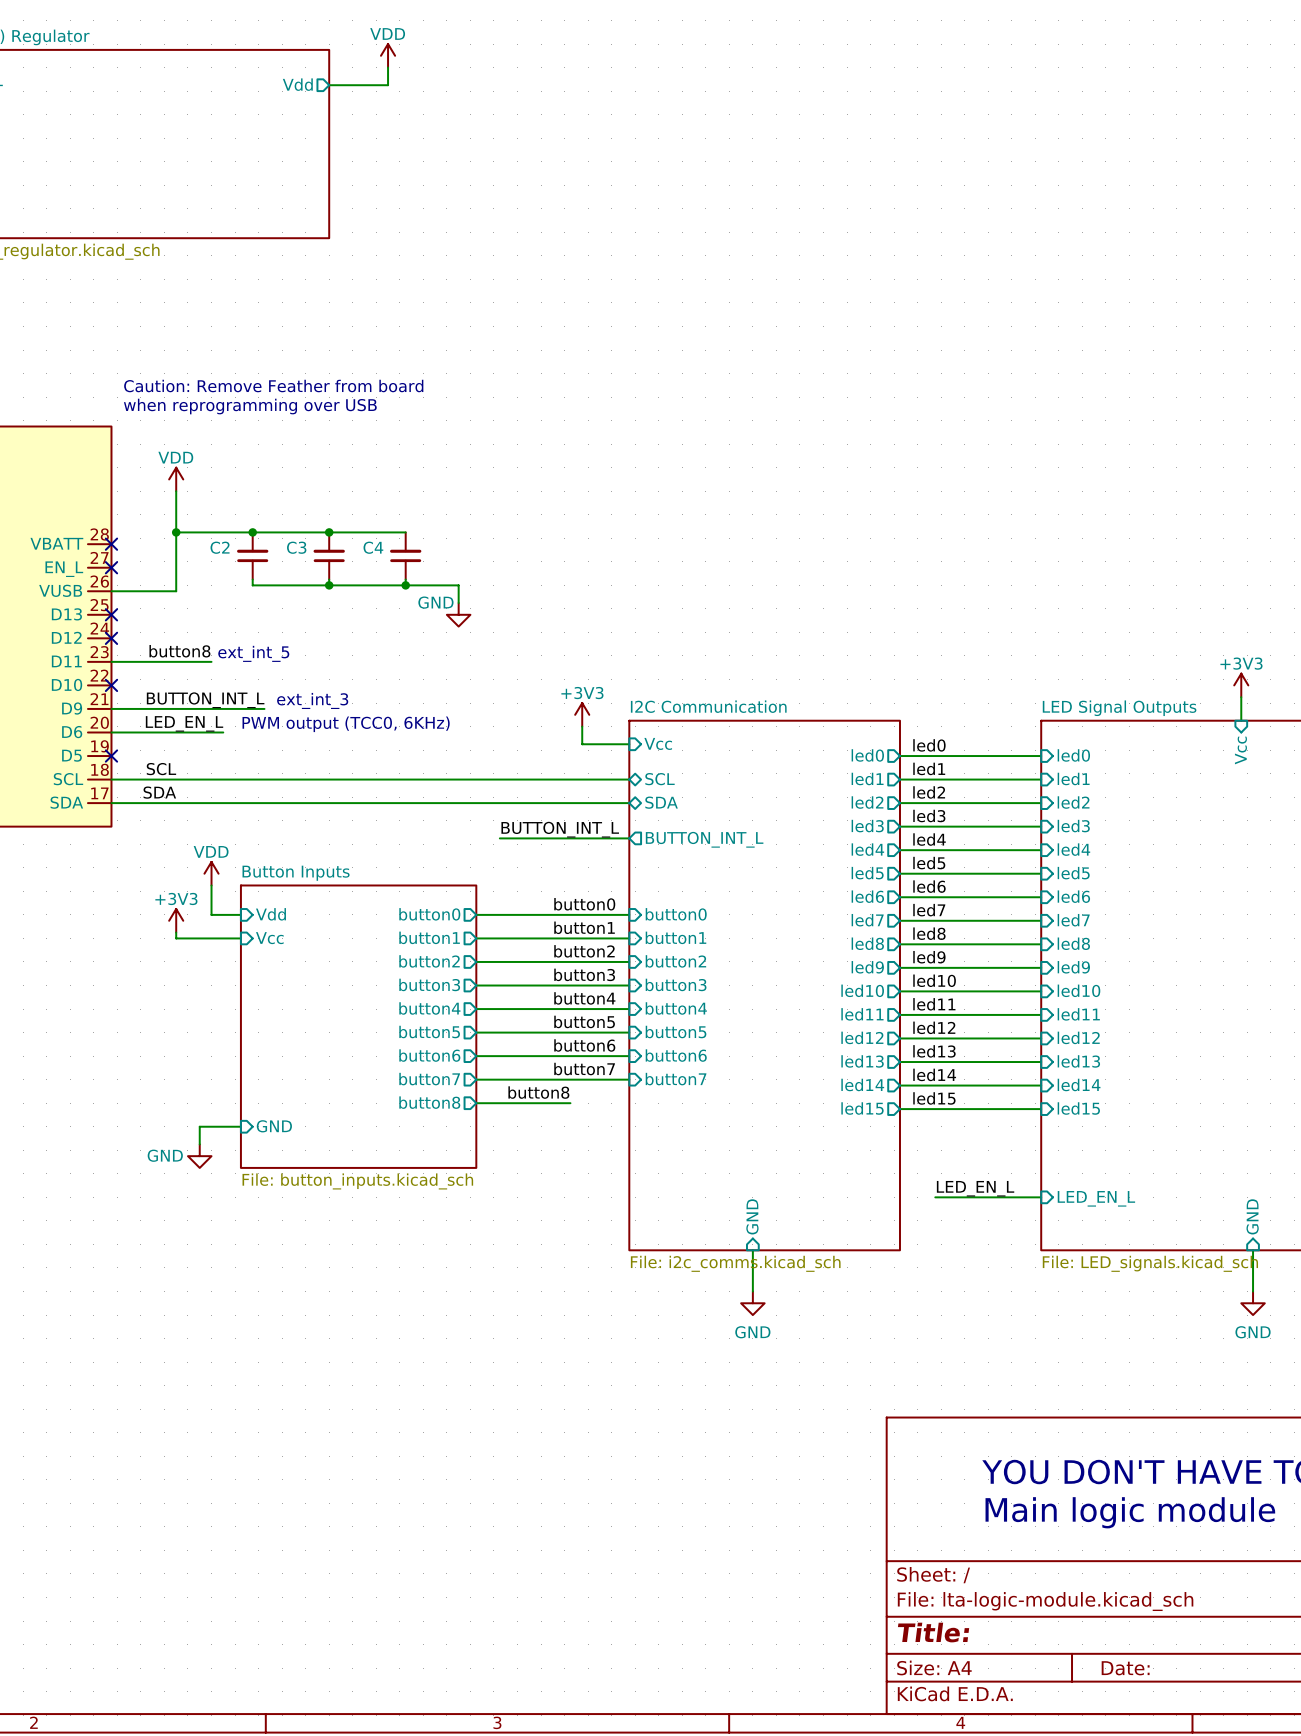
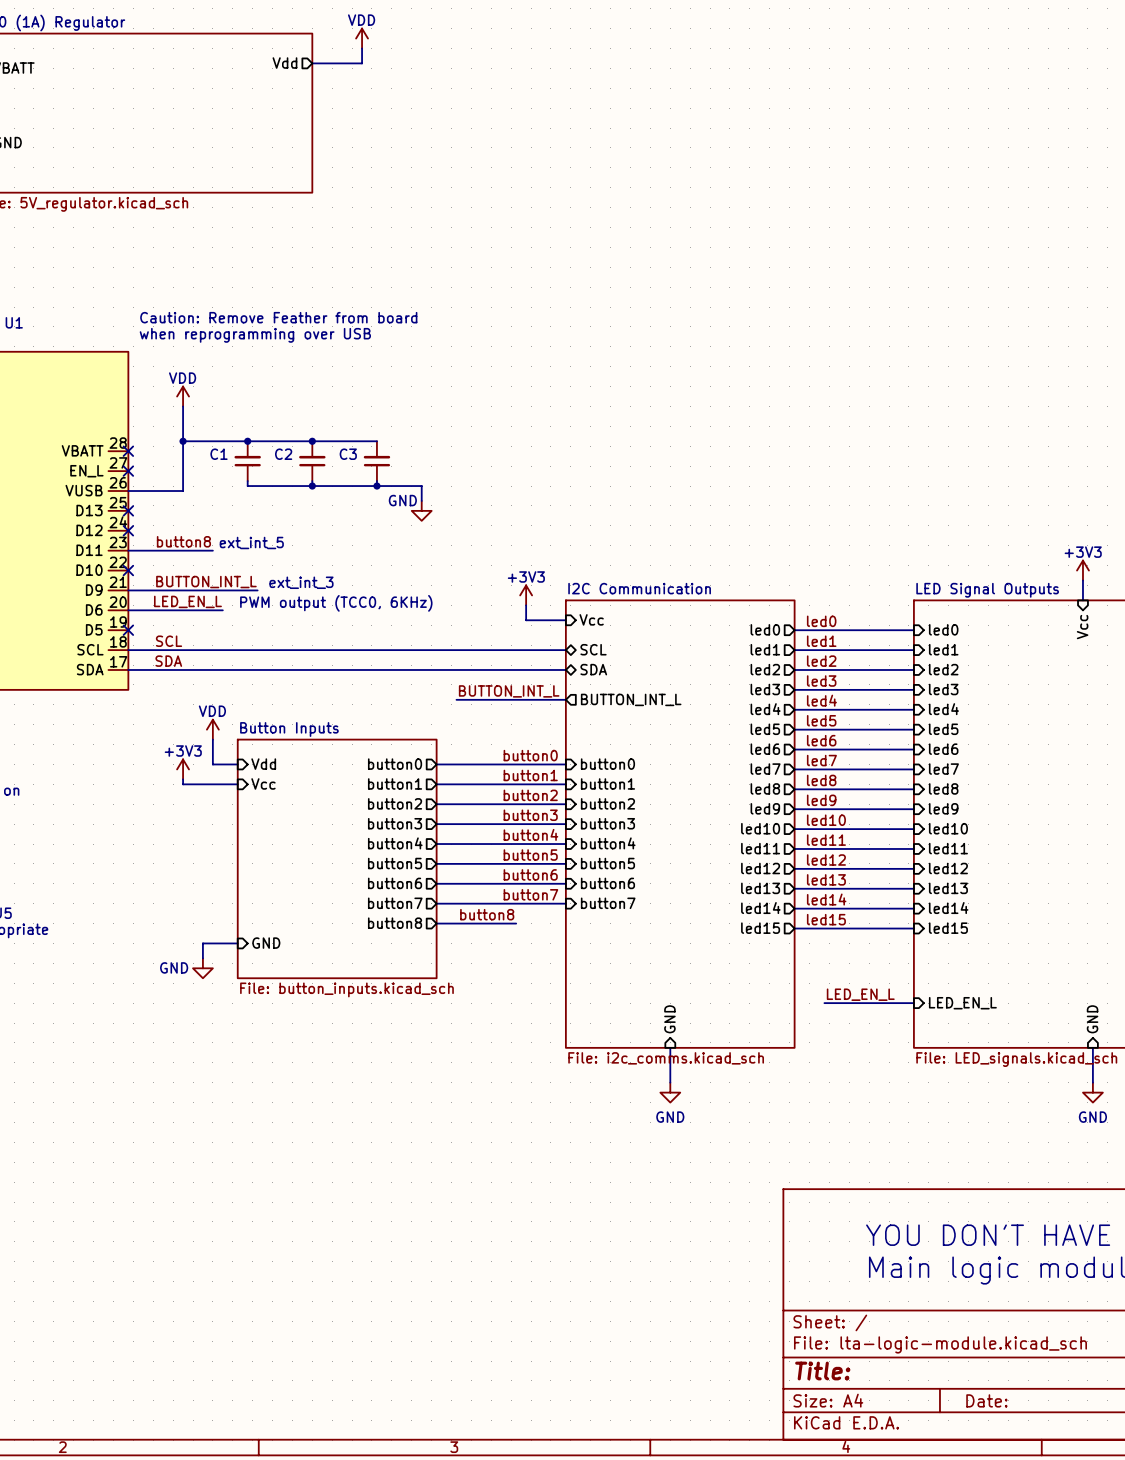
C2 name: C2 (220, 547) -> C1 (219, 454)
C3 name: C3 (296, 547) -> C2 (283, 454)
C4 name: C4 (373, 547) -> C3 (348, 454)

